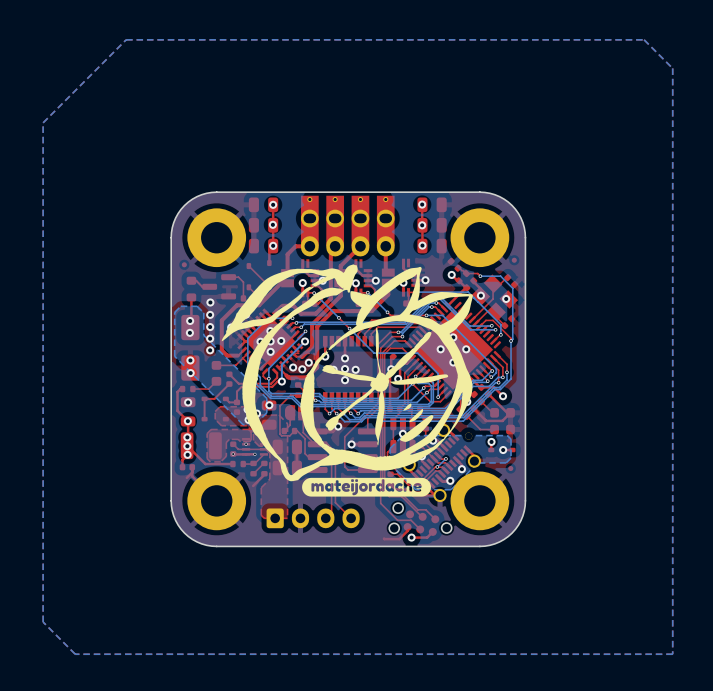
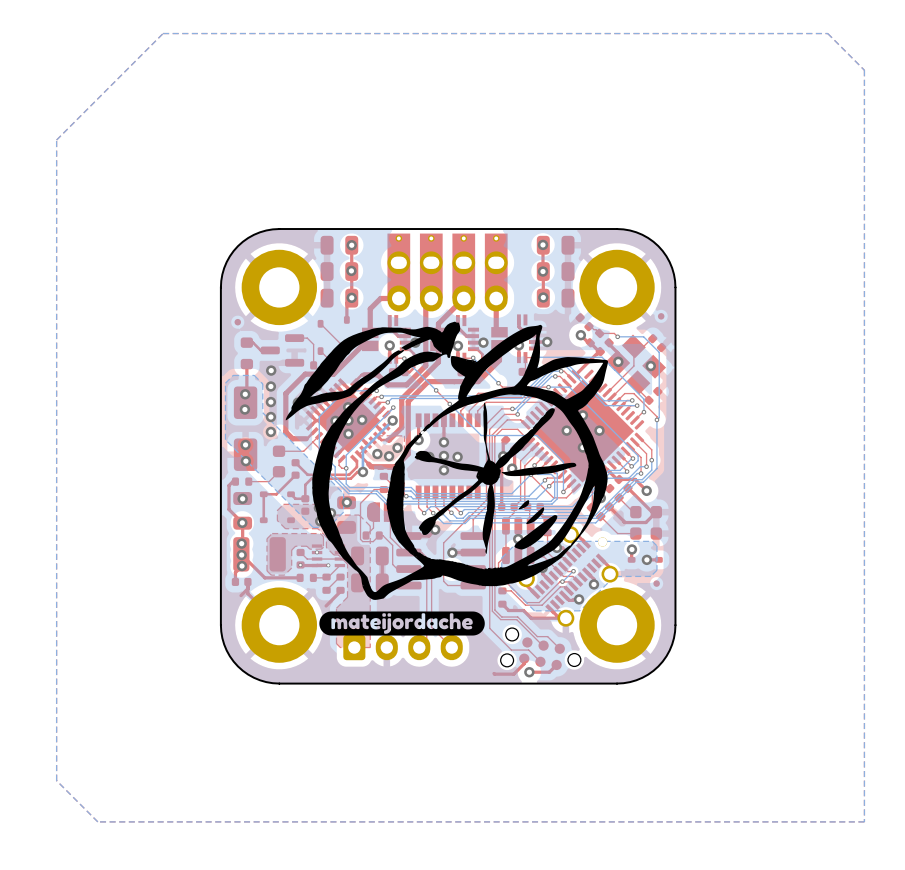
drawing position: (366, 487) -> (402, 623)

